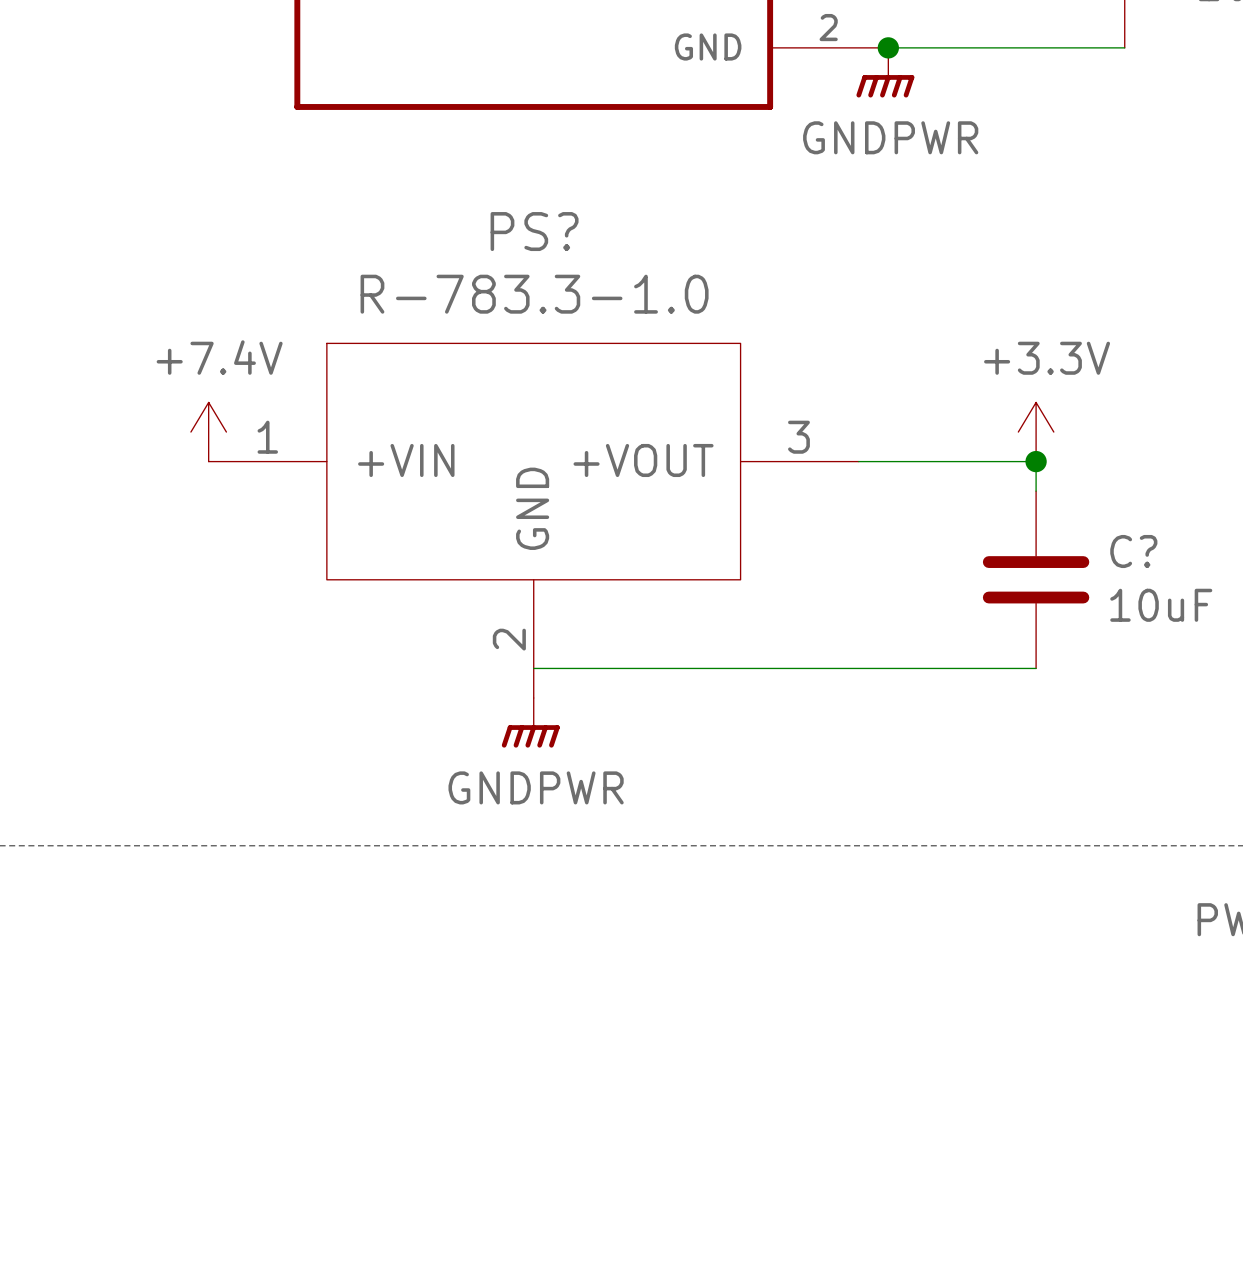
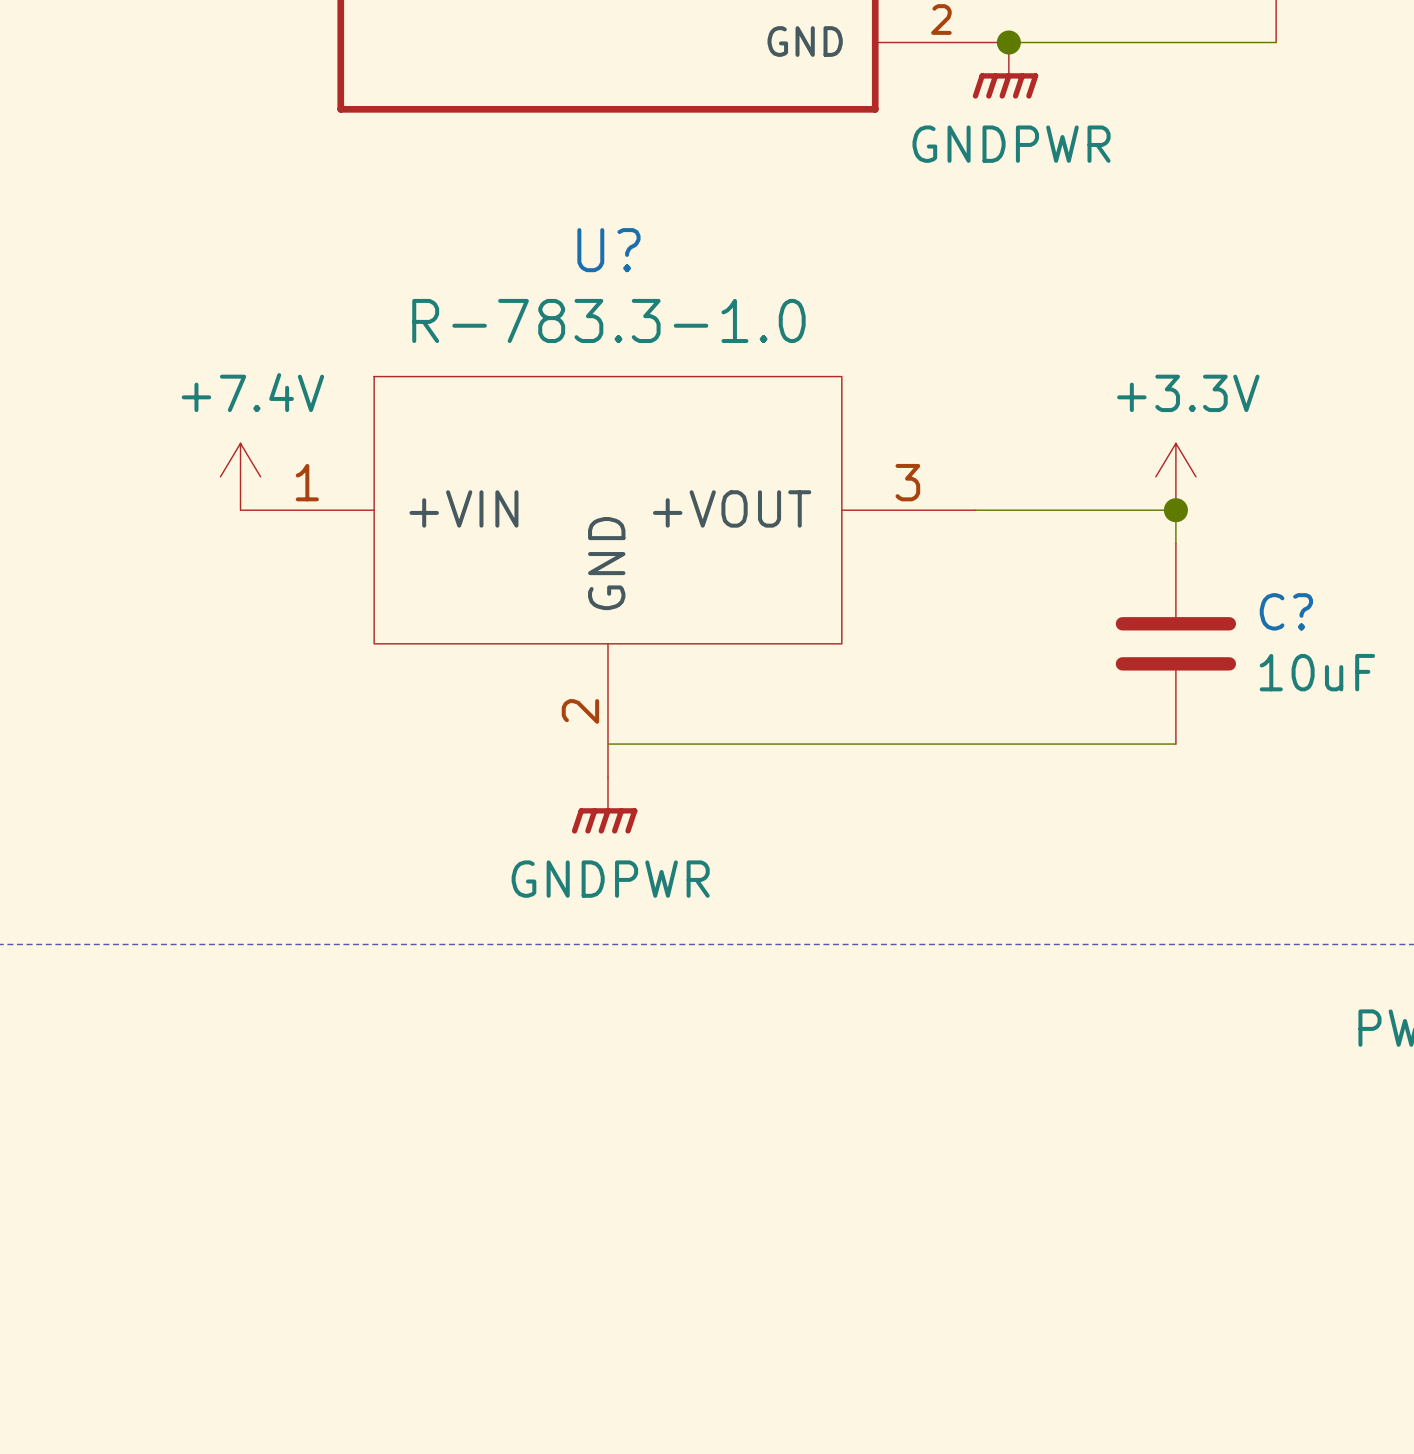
PS? name: PS? (534, 231) -> U? (608, 250)

